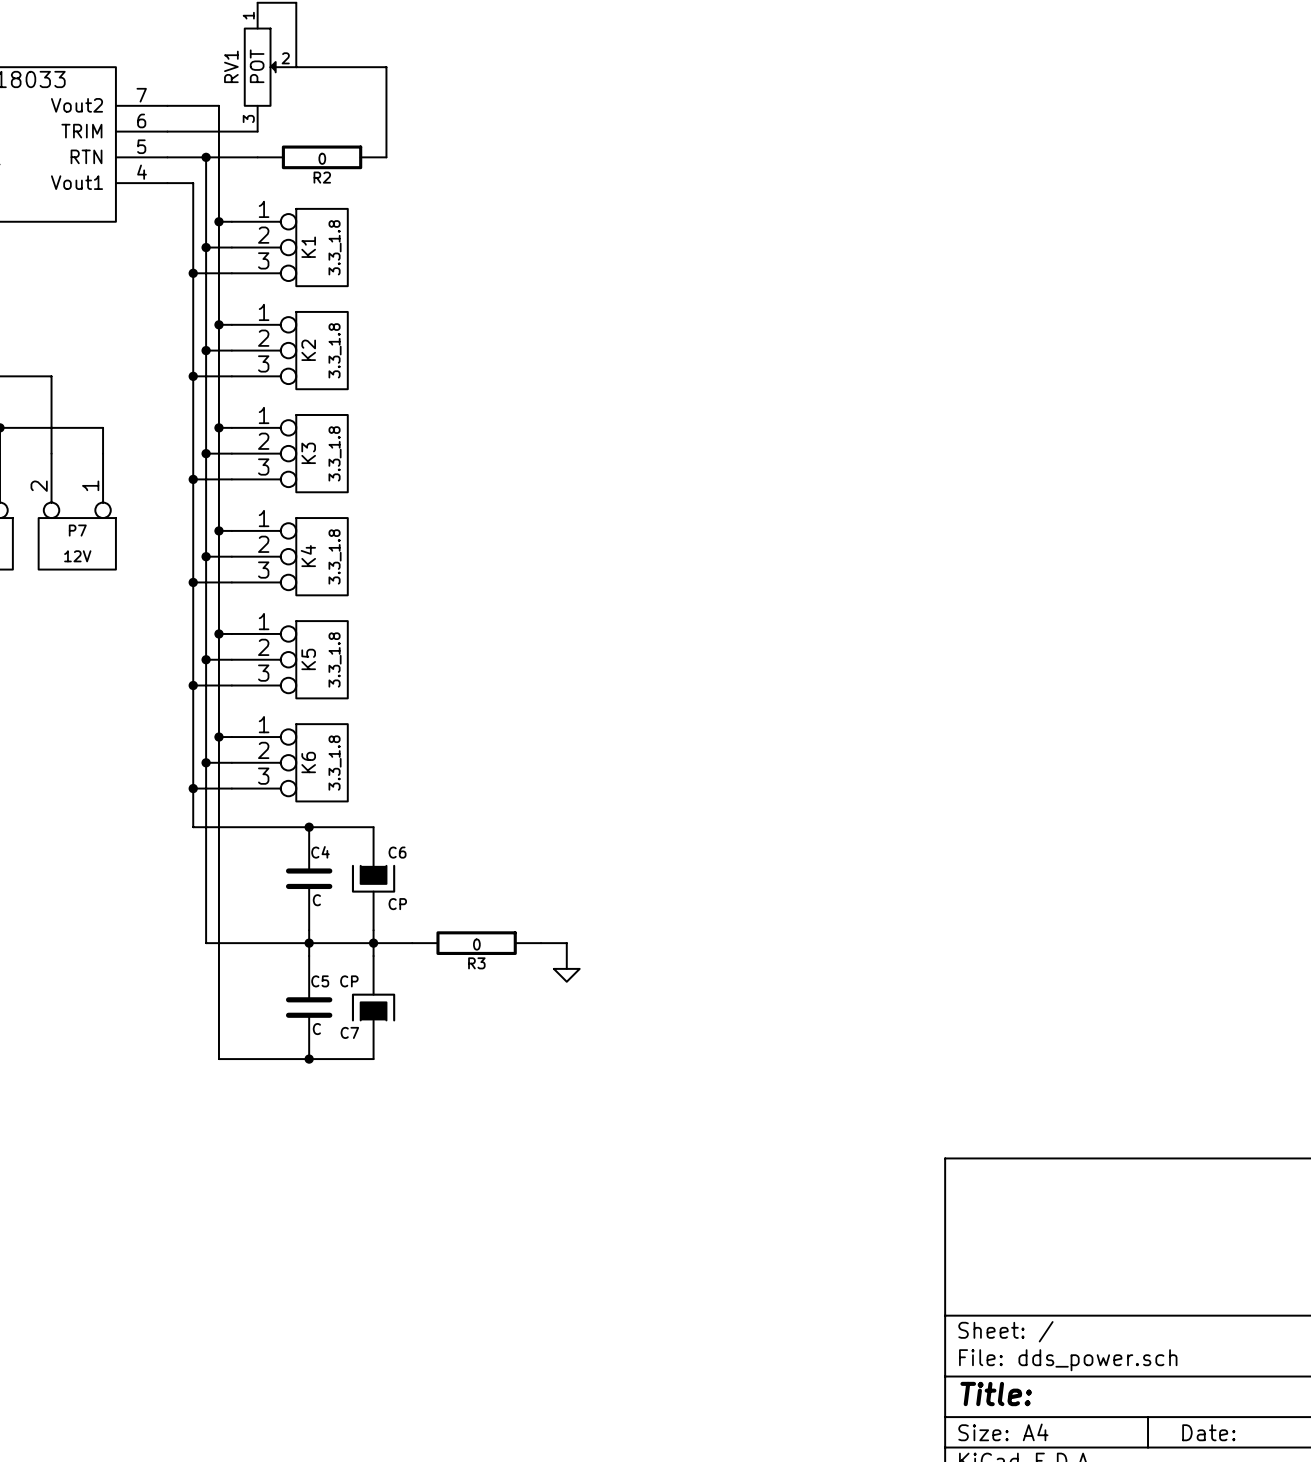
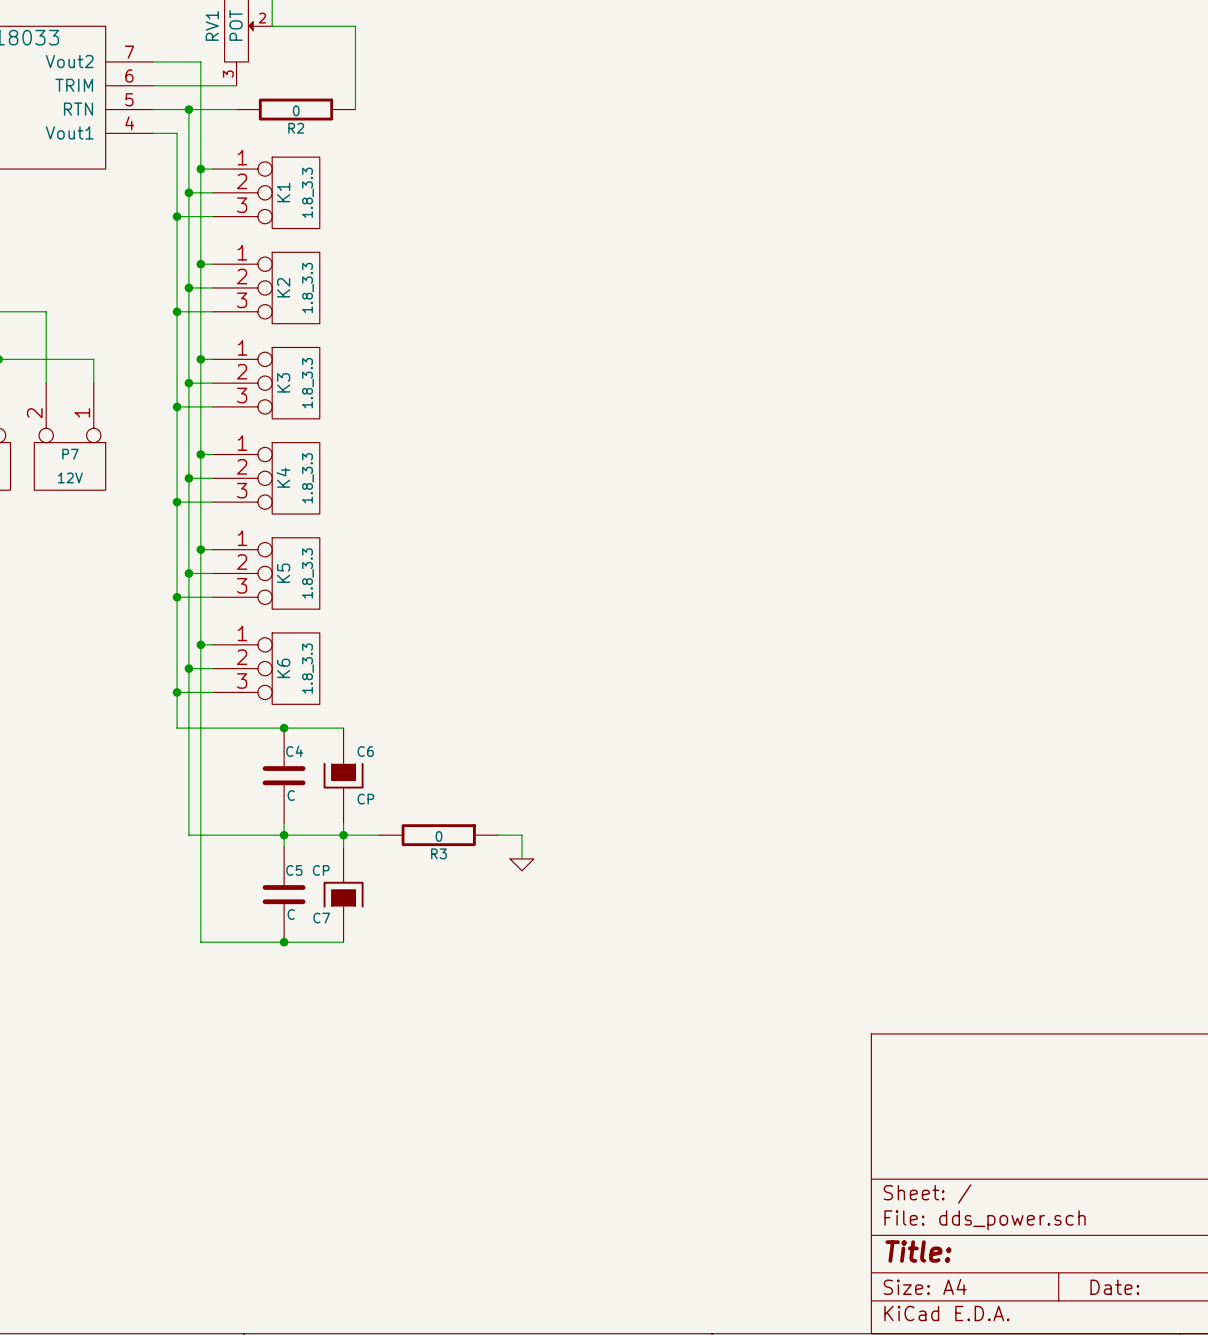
K1 value: 3.3_1.8 (335, 247) -> 1.8_3.3 (307, 192)
K2 value: 3.3_1.8 (335, 350) -> 1.8_3.3 (307, 287)
K3 value: 3.3_1.8 (335, 453) -> 1.8_3.3 (307, 383)
K4 value: 3.3_1.8 (335, 556) -> 1.8_3.3 (307, 478)
K5 value: 3.3_1.8 (335, 659) -> 1.8_3.3 (307, 573)
K6 value: 3.3_1.8 (335, 763) -> 1.8_3.3 (307, 668)

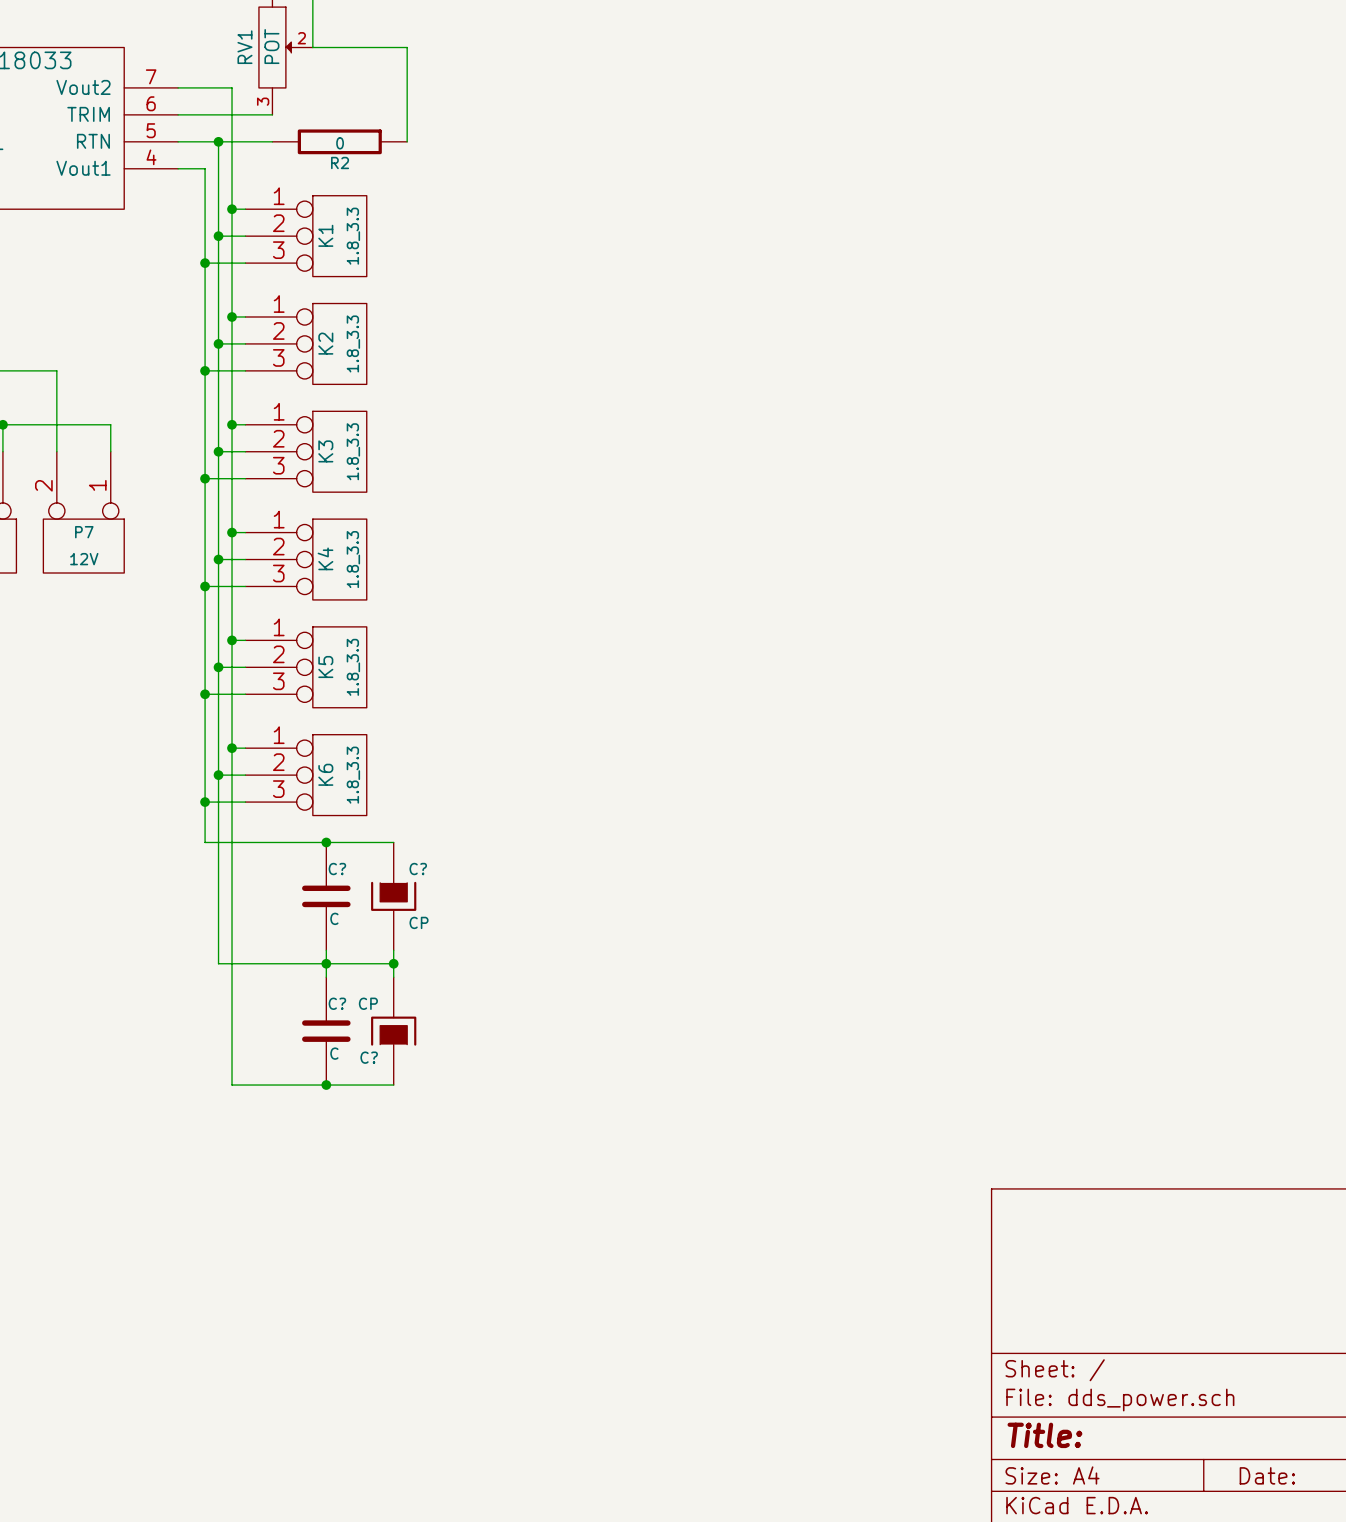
C4 name: C4 (294, 751) -> C? (337, 869)
C6 name: C6 (365, 751) -> C? (418, 869)
wire: (343, 835) (379, 835) -> none
R3: 0 (438, 835) -> none
wire: (498, 835) (522, 835) (522, 858) -> none
power symbol: (522, 864) -> none
C5 name: C5 (294, 870) -> C? (337, 1003)
C7 name: C7 (321, 918) -> C? (369, 1057)

